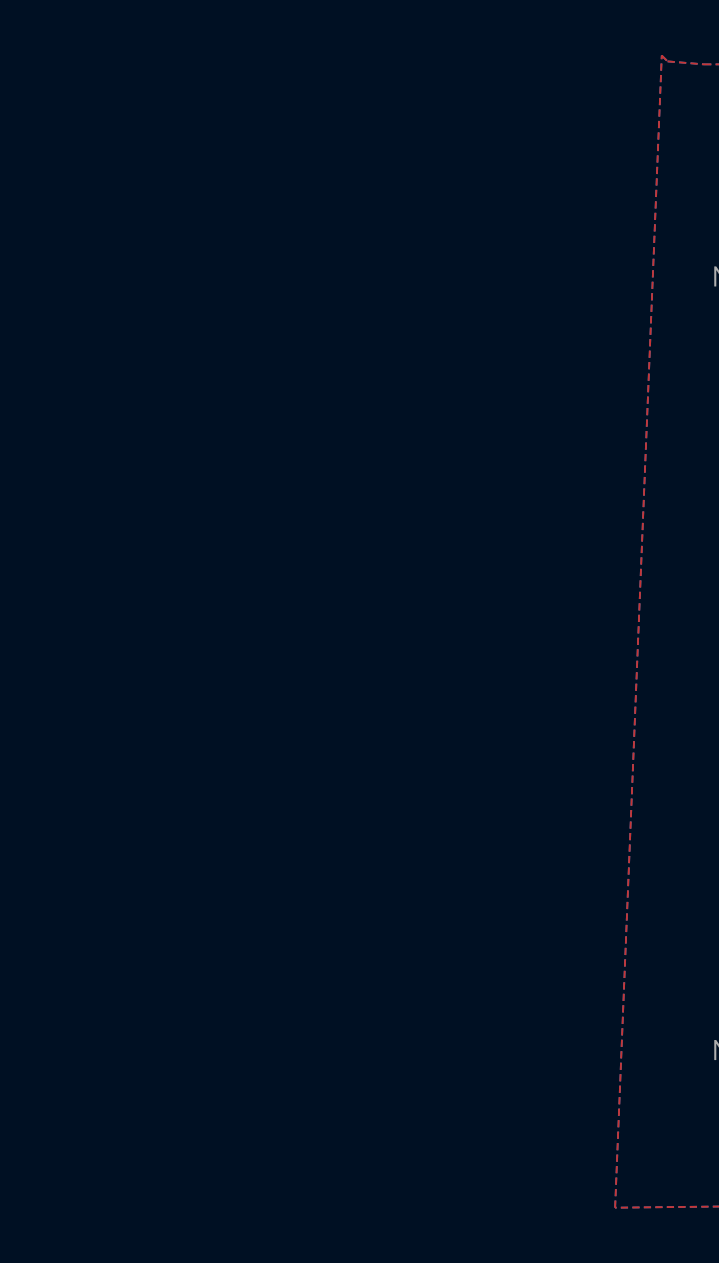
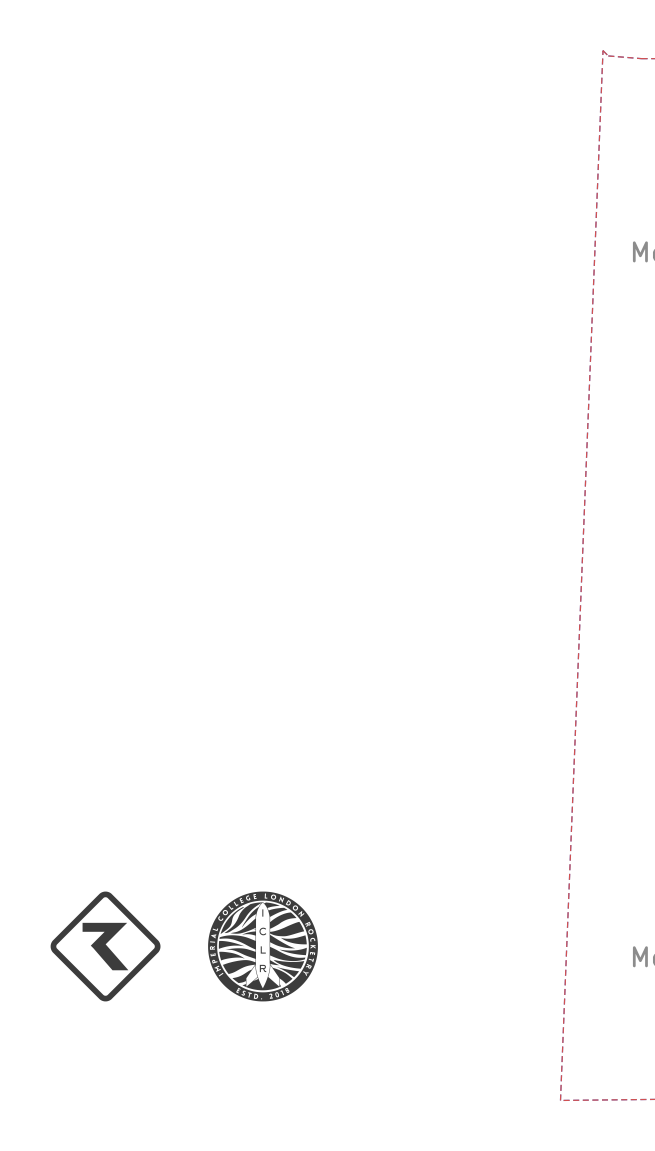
drawing: none -> [50, 891, 161, 1002]
drawing: none -> [208, 891, 318, 1002]

